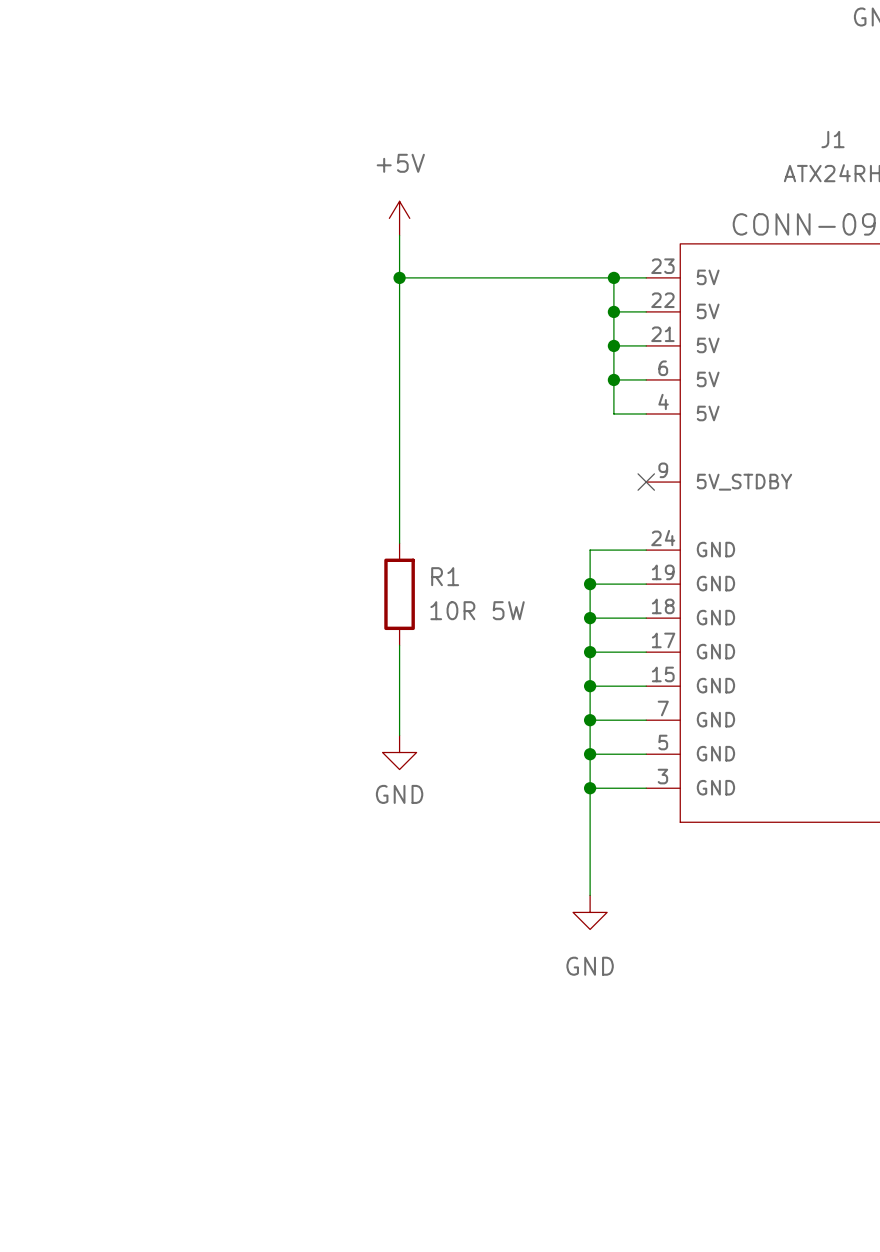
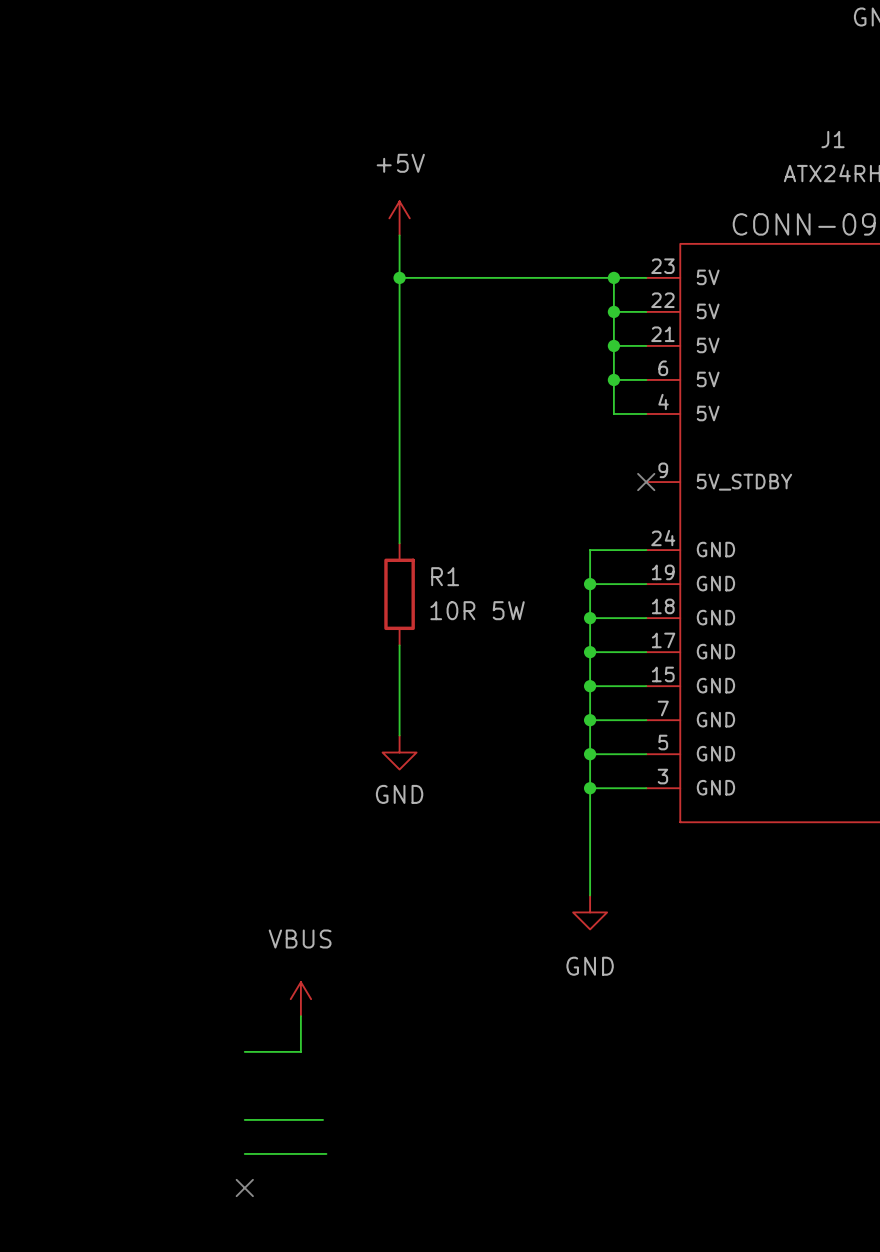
power symbol: none -> VBUS (300, 999)
wire: none -> (300, 1016) (300, 1051) (244, 1051)
wire: none -> (244, 1119) (323, 1119)
wire: none -> (244, 1153) (326, 1153)
no-connect mark: none -> (244, 1188)

